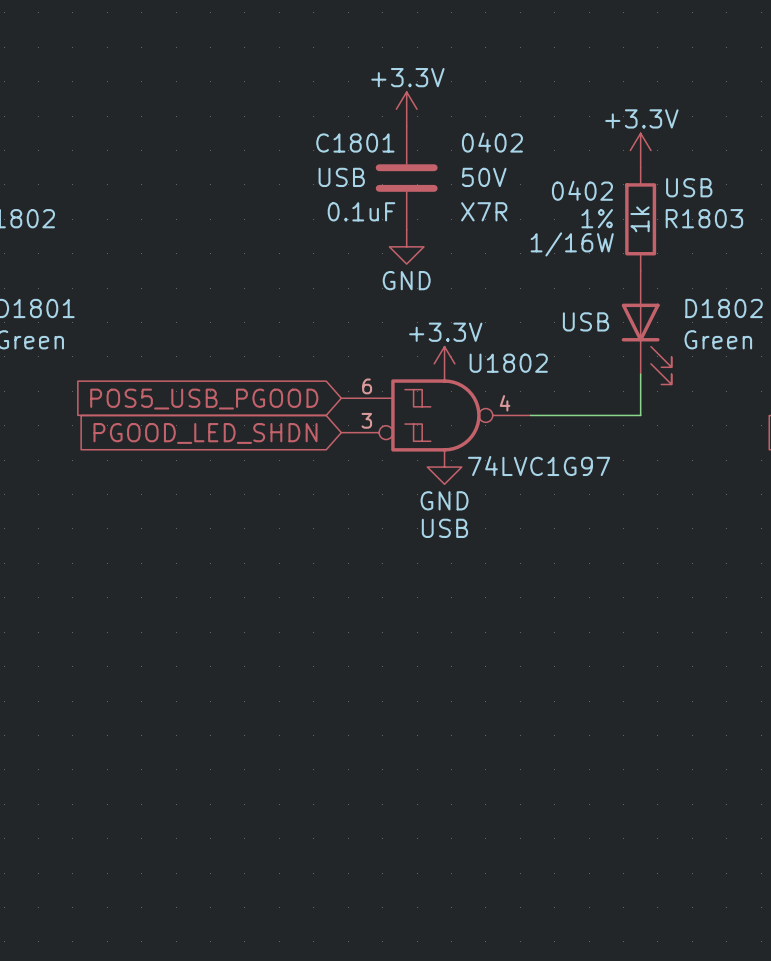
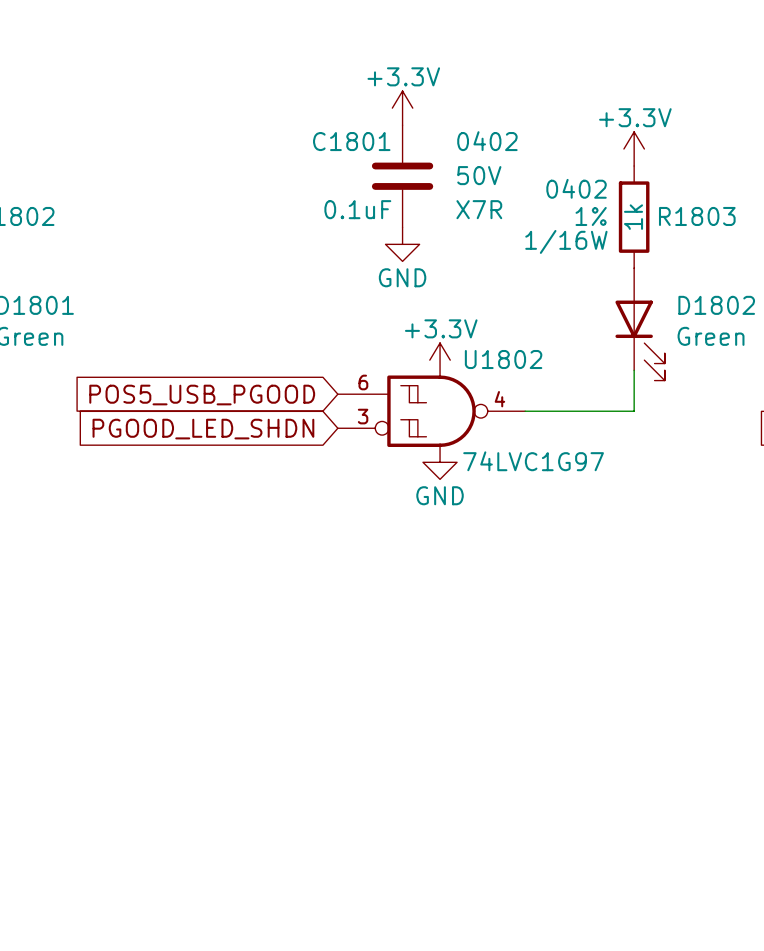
C1801 text: USB (341, 177) -> none
R1803 text: USB (689, 187) -> none
D1802 text: USB (586, 321) -> none
U1802 text: USB (444, 528) -> none

